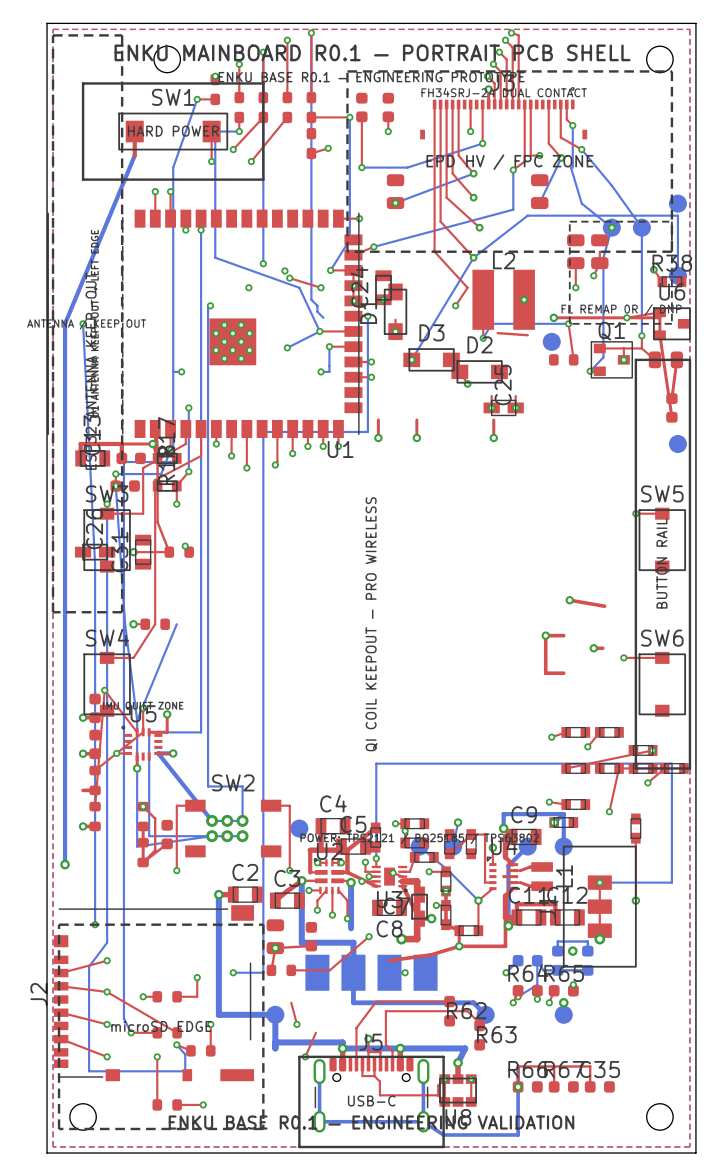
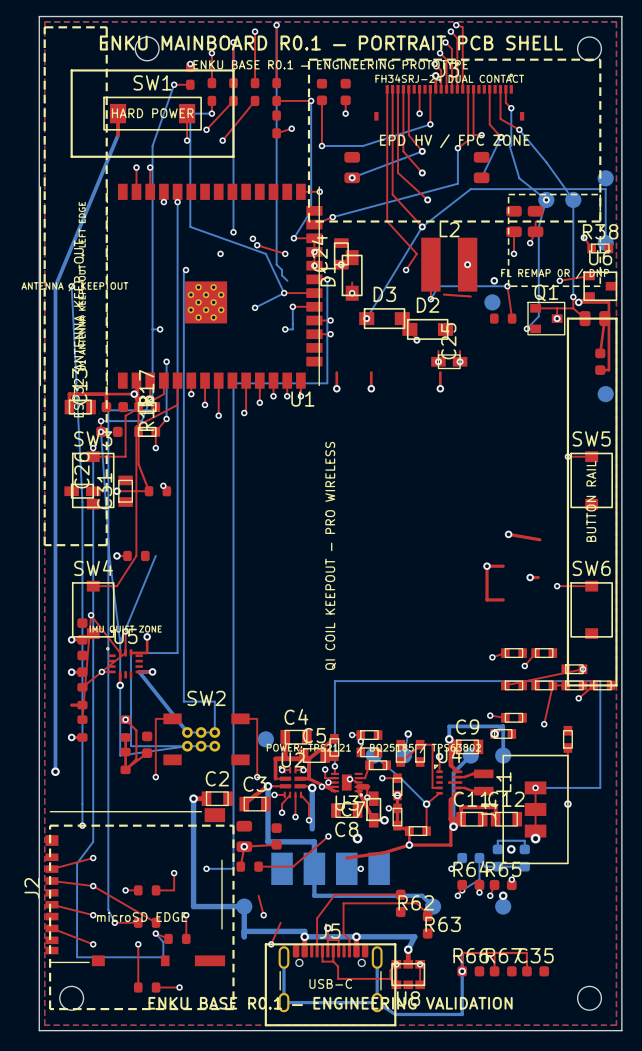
top track: (553, 317) (659, 317) (659, 335) (671, 417) -> (589, 296) (578, 302) (608, 302) (608, 370) (600, 370)
via: none -> (578, 302)
top track: (412, 881) (417, 881) (417, 939) (401, 939) -> (367, 786) (367, 797)
via: none -> (367, 797)

